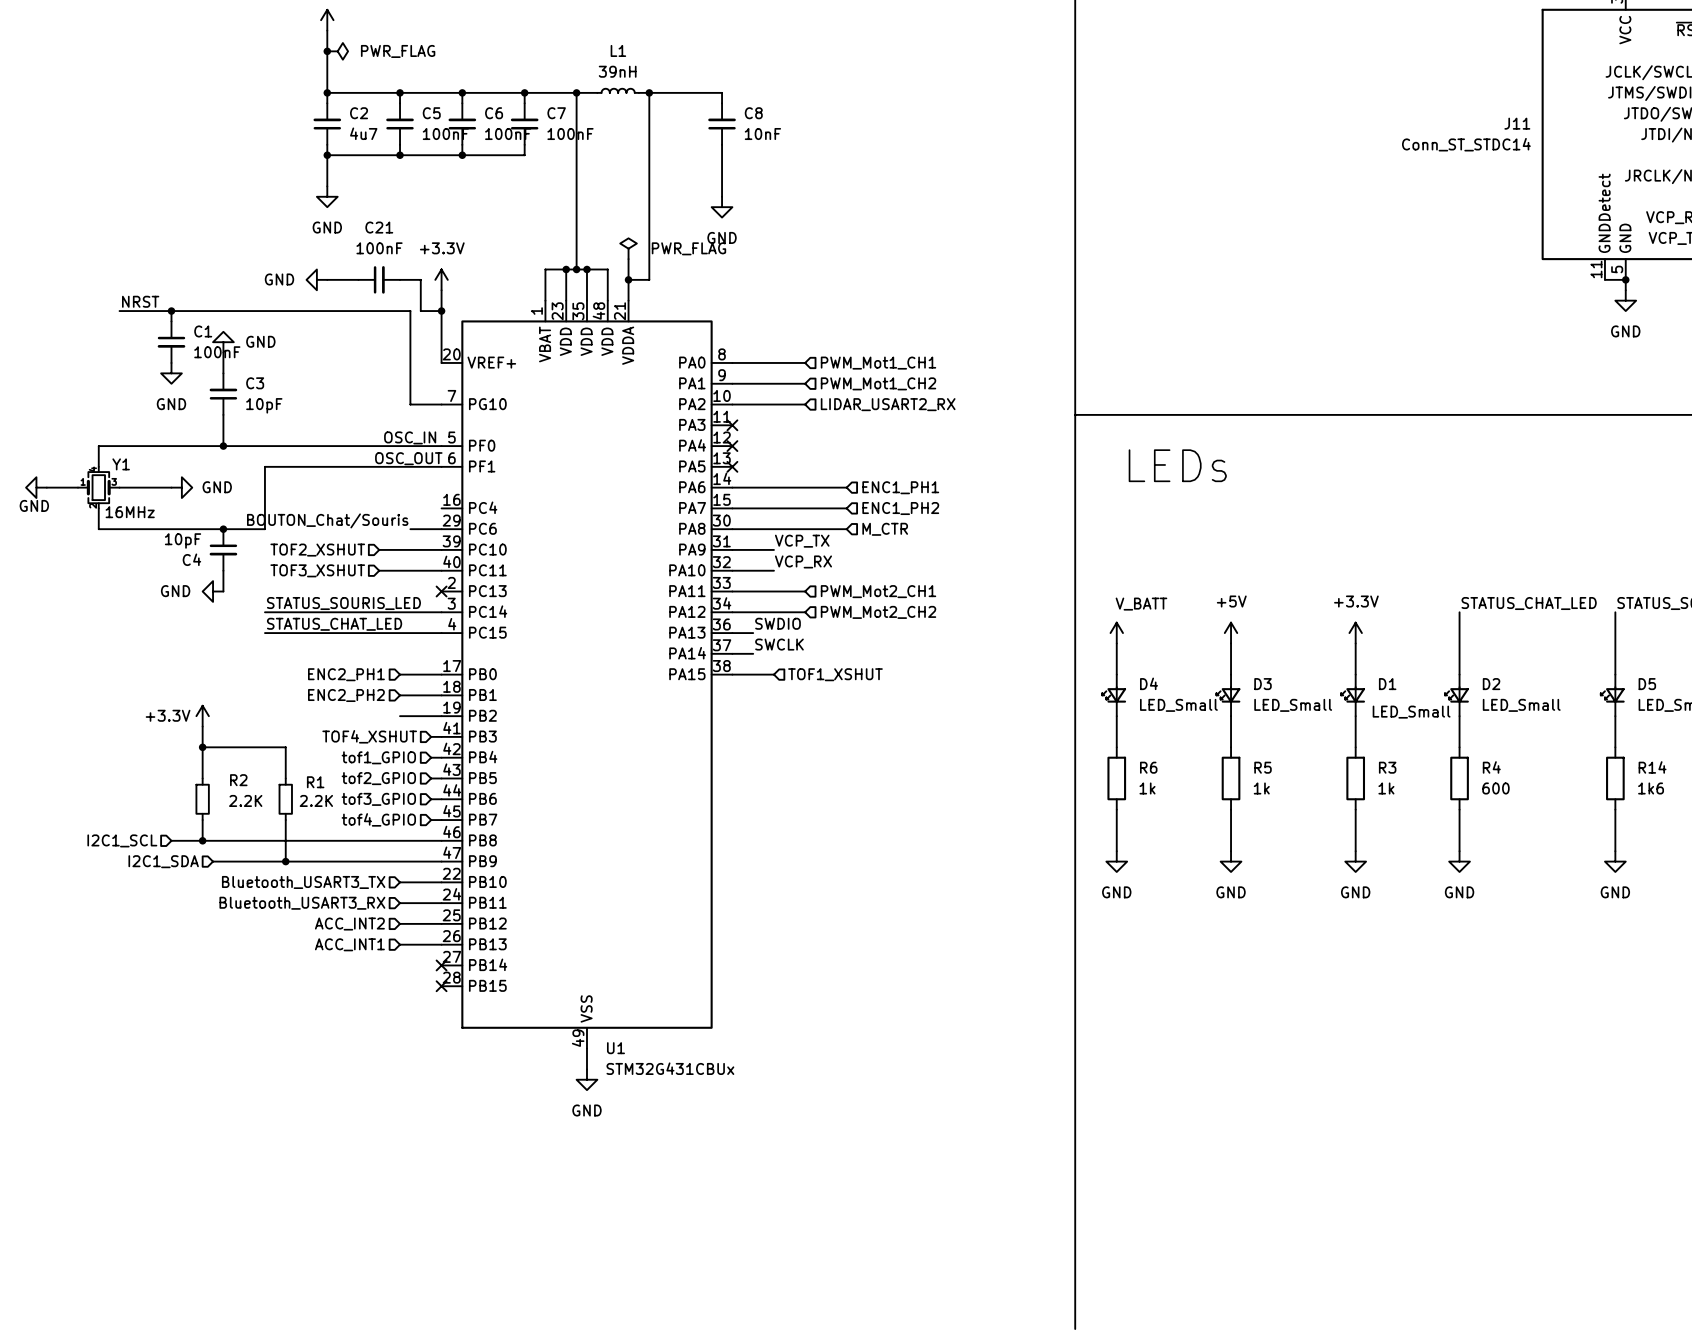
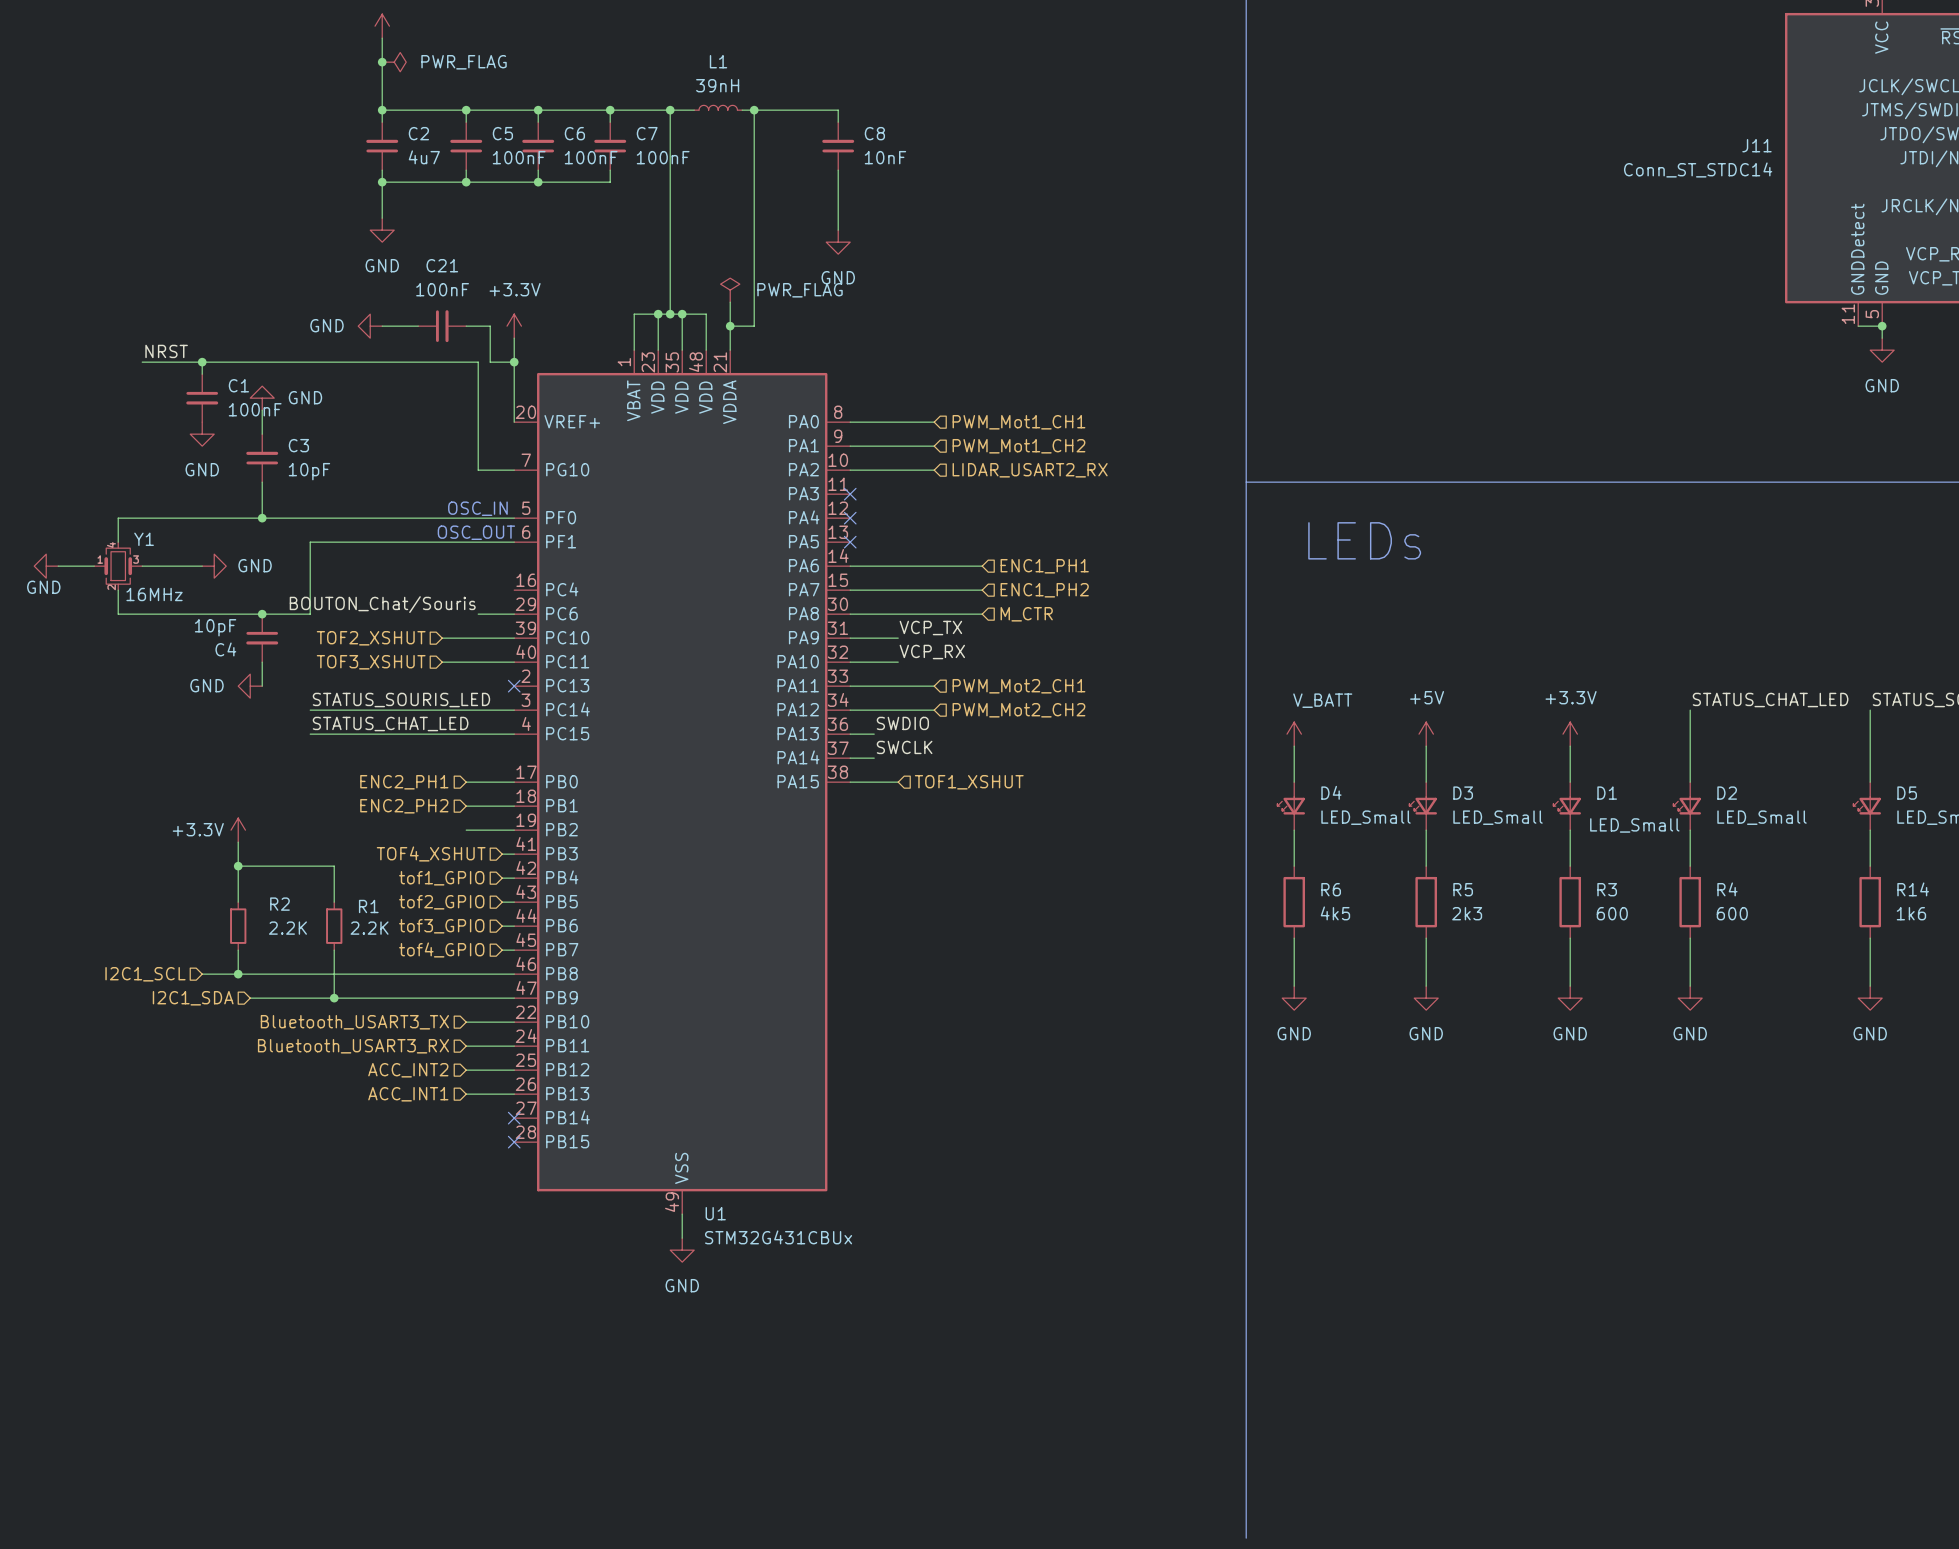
R6 value: 1k (1147, 788) -> 4k5 (1335, 913)
R5 value: 1k (1261, 788) -> 2k3 (1467, 913)
R3 value: 1k (1386, 788) -> 600 (1612, 913)

